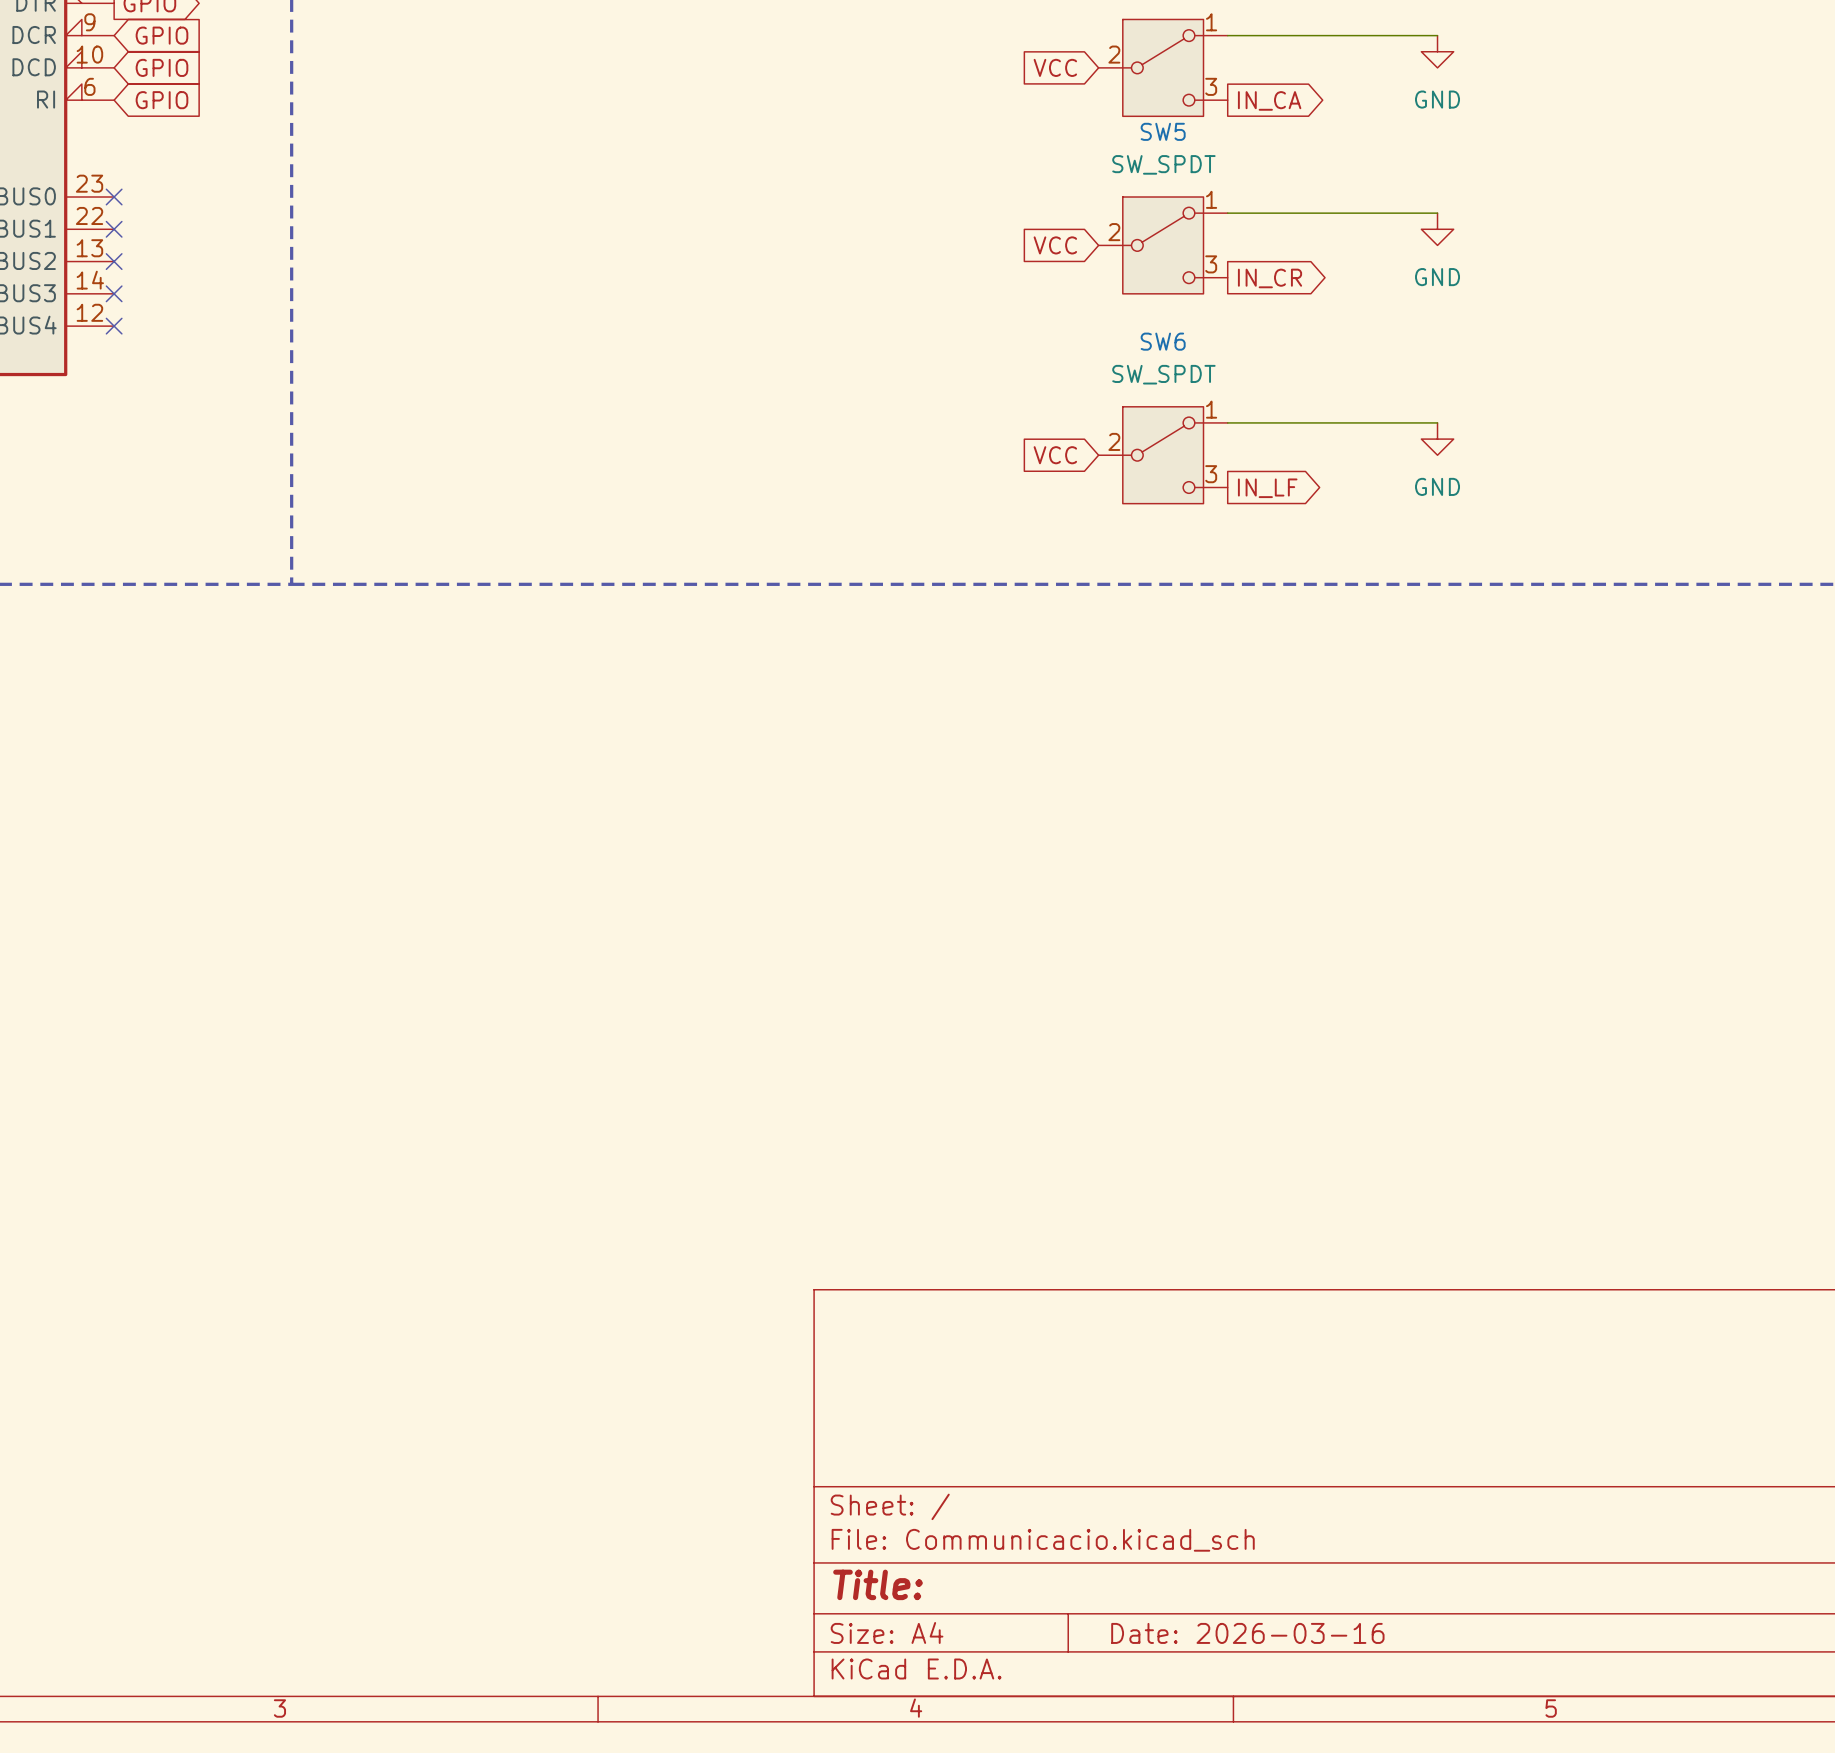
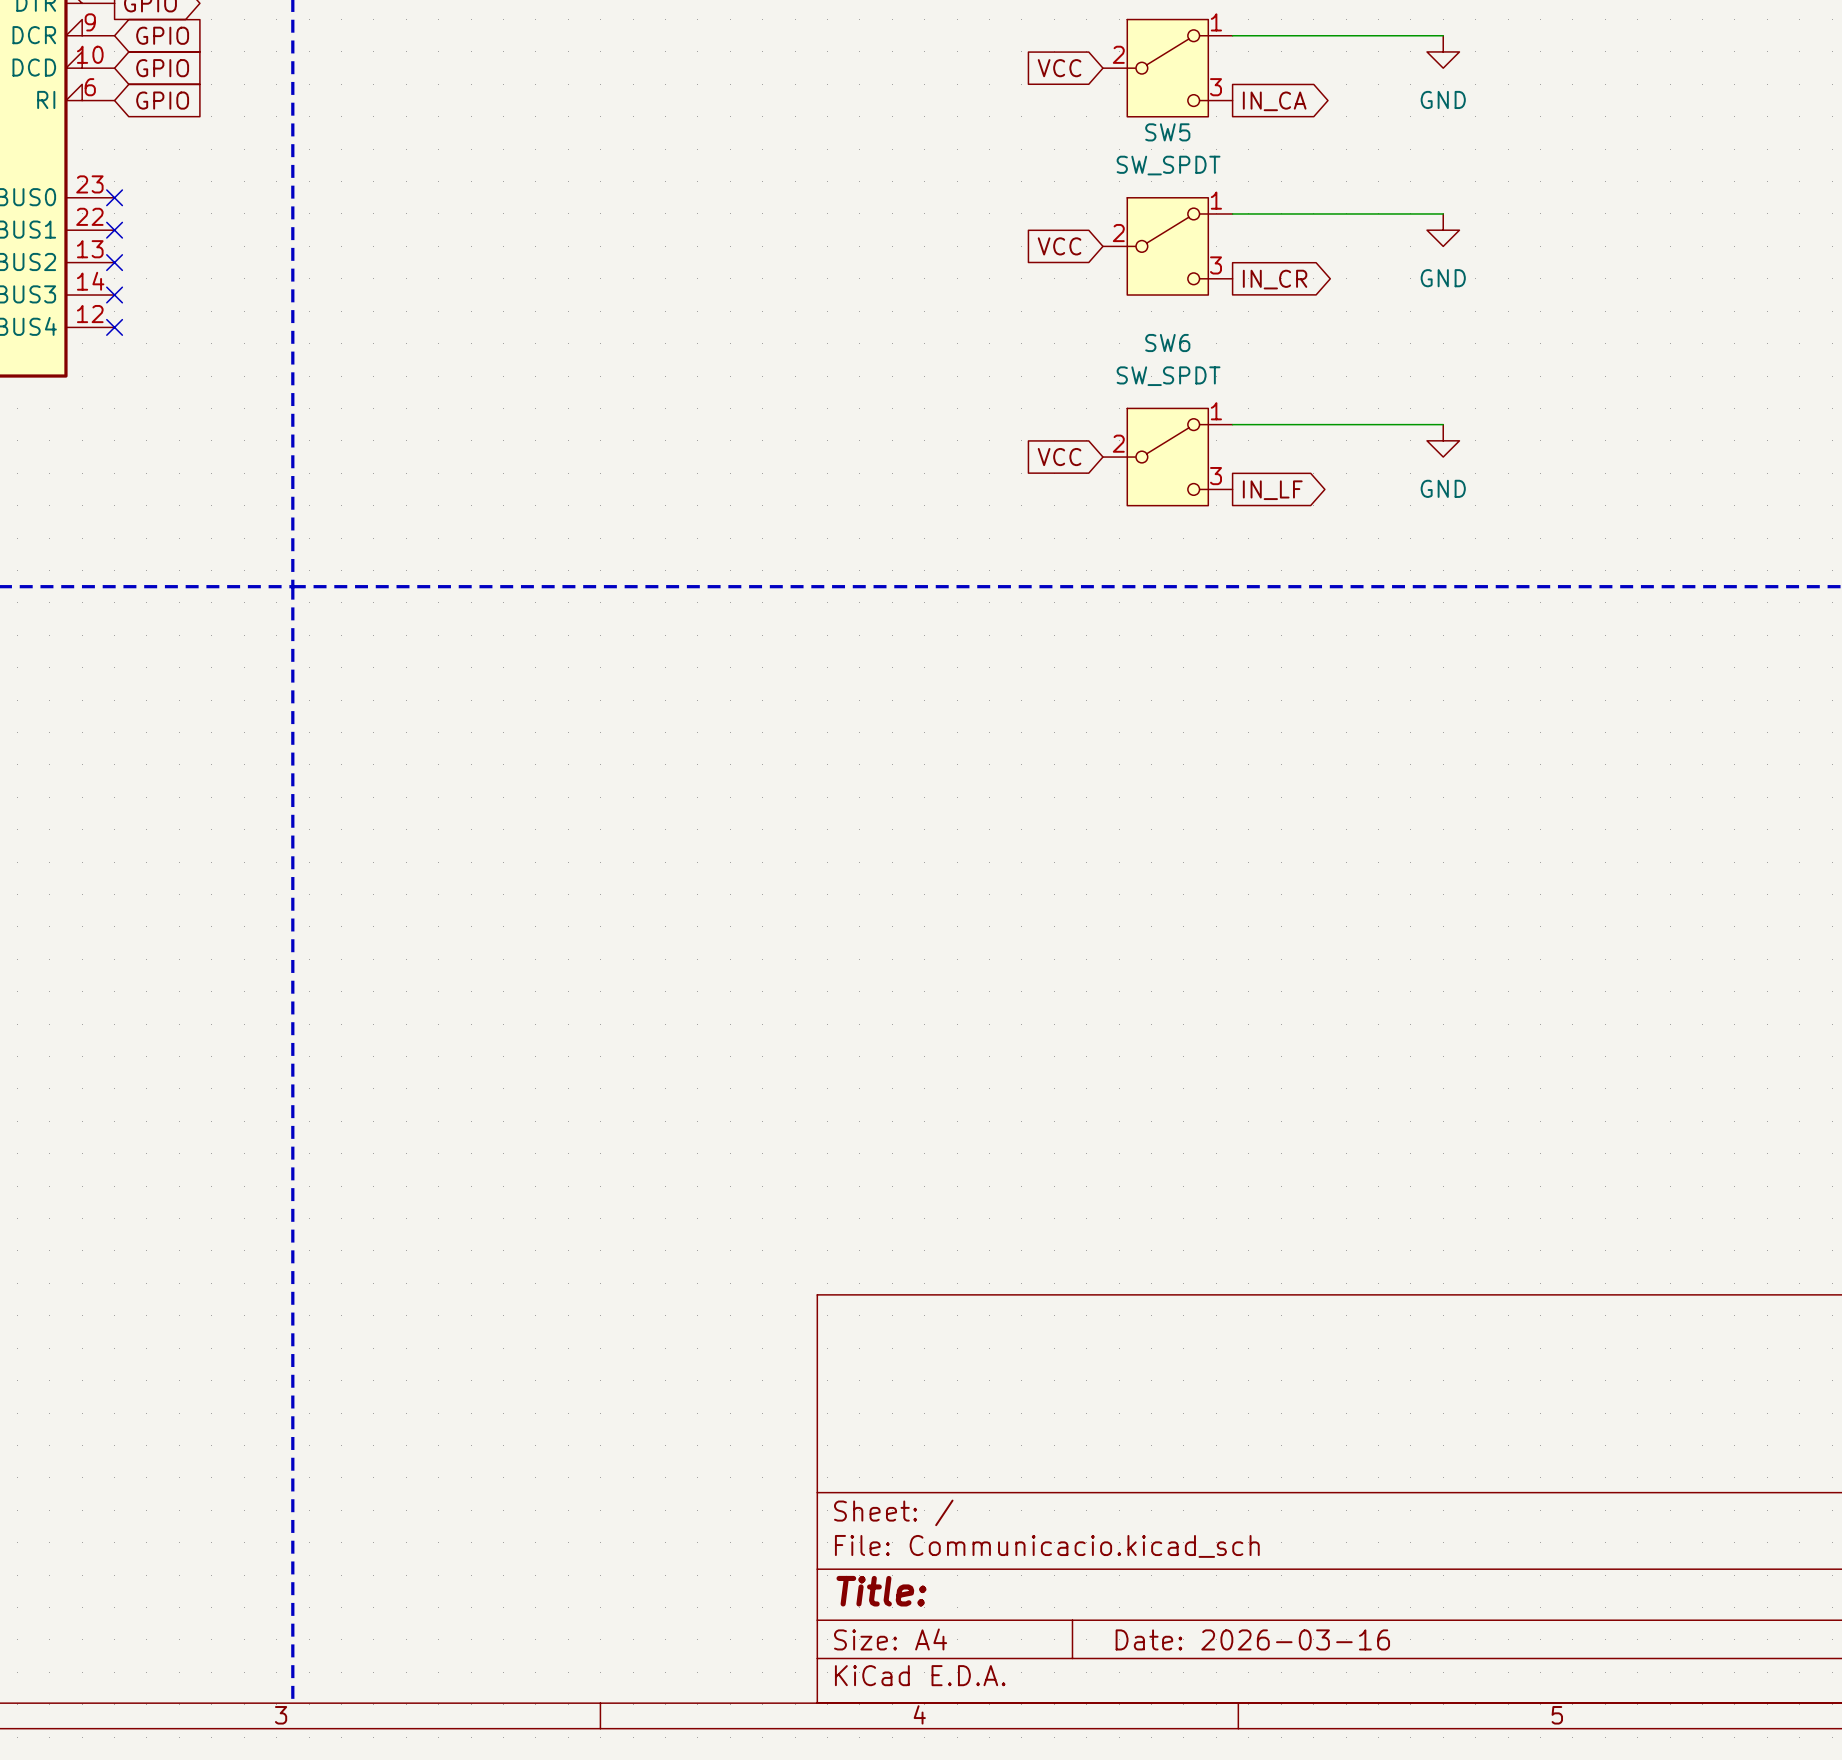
line: none -> (292, 586) (292, 1704)

